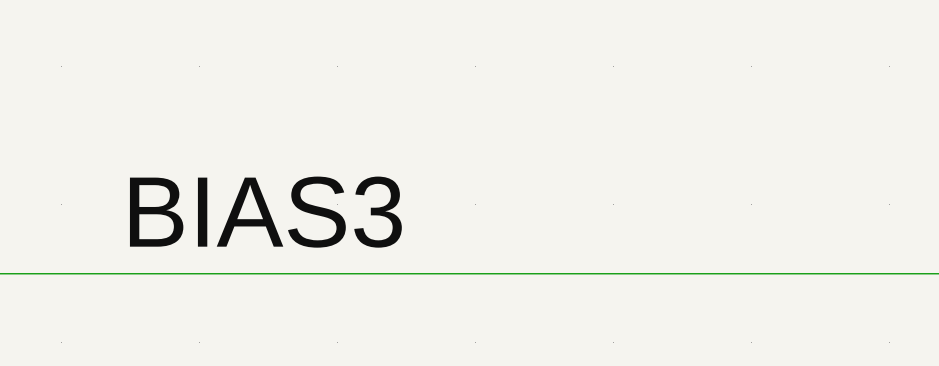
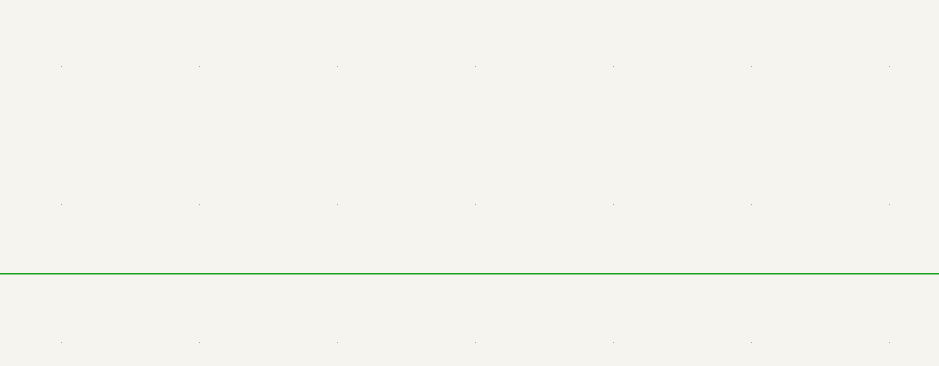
label: BIAS3 (265, 212) -> none

